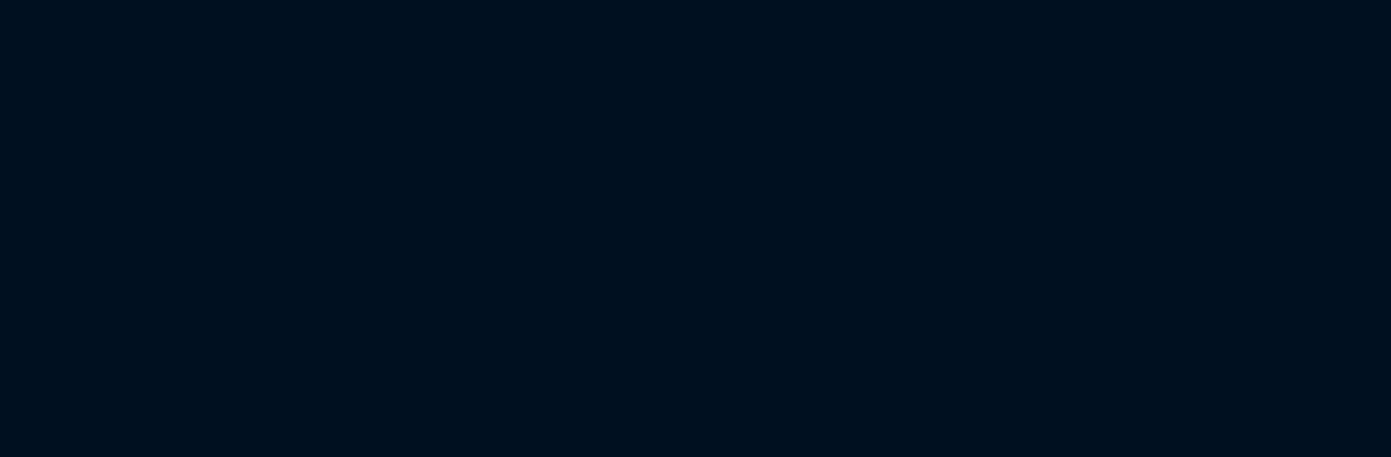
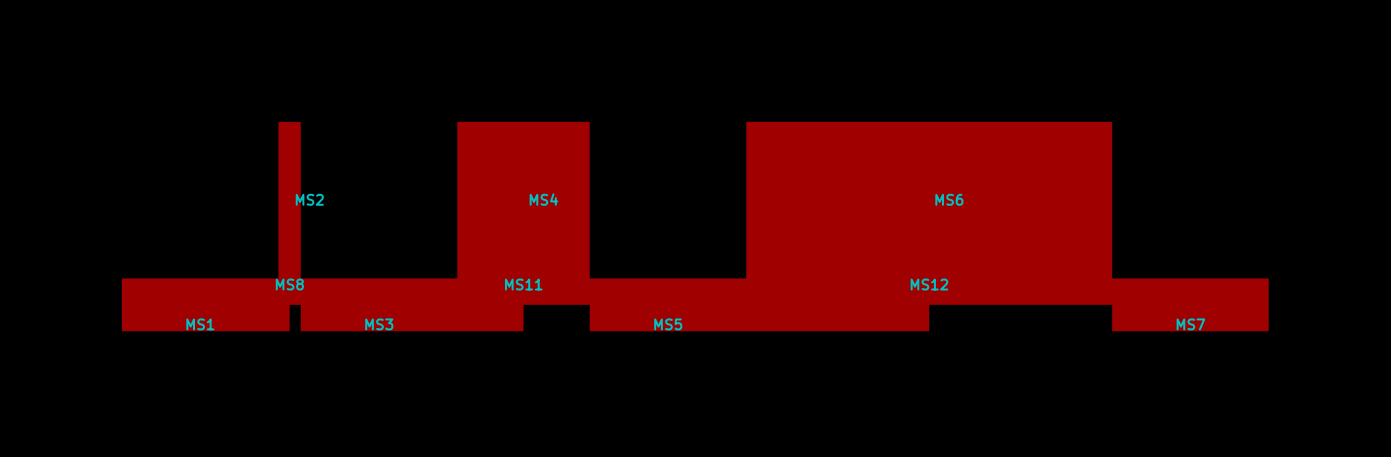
MS2: none -> (289, 200)
MS4: none -> (523, 200)
MS6: none -> (929, 200)
MS1: none -> (200, 304)
MS8: none -> (289, 304)
MS3: none -> (379, 304)
MS11: none -> (523, 304)
MS5: none -> (668, 304)
MS12: none -> (929, 304)
MS7: none -> (1190, 304)

